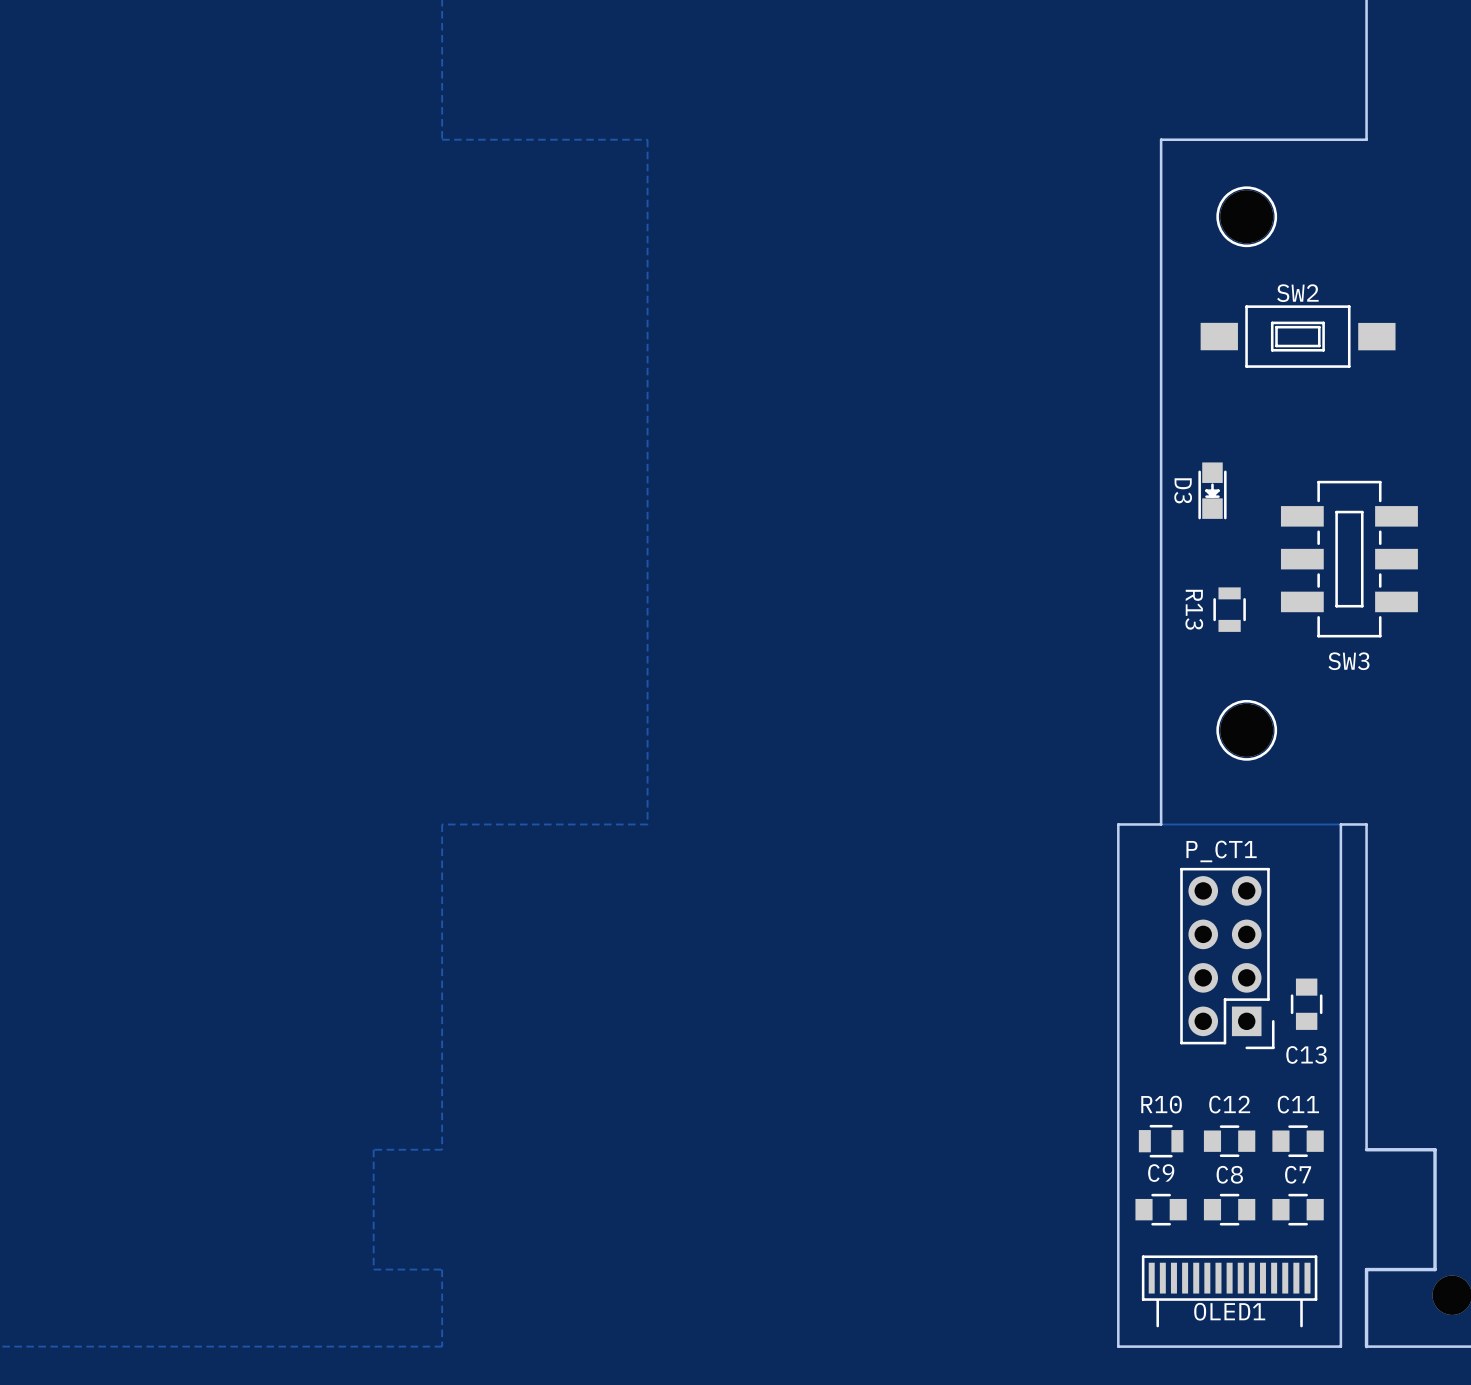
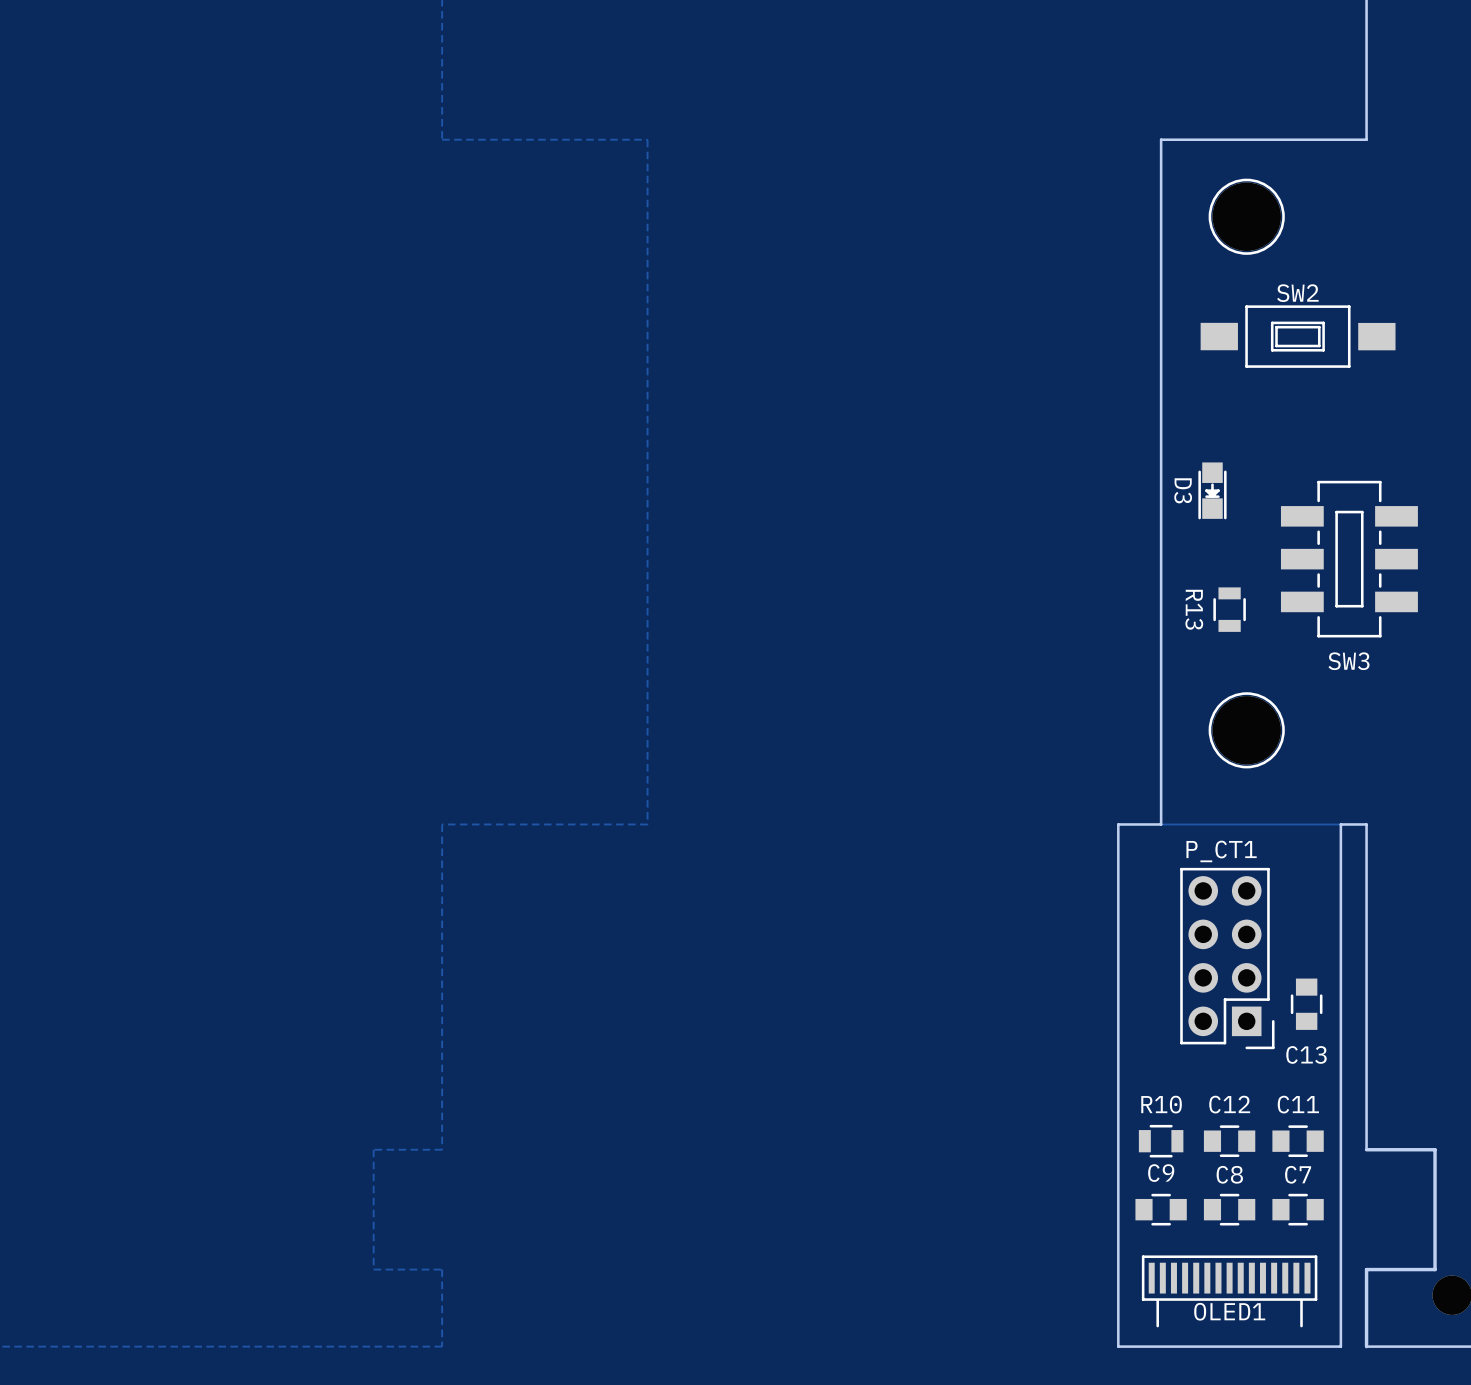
part footprint: [1216, 186, 1278, 248] -> [1208, 178, 1285, 255]
part footprint: [1216, 699, 1278, 761] -> [1208, 692, 1285, 769]

